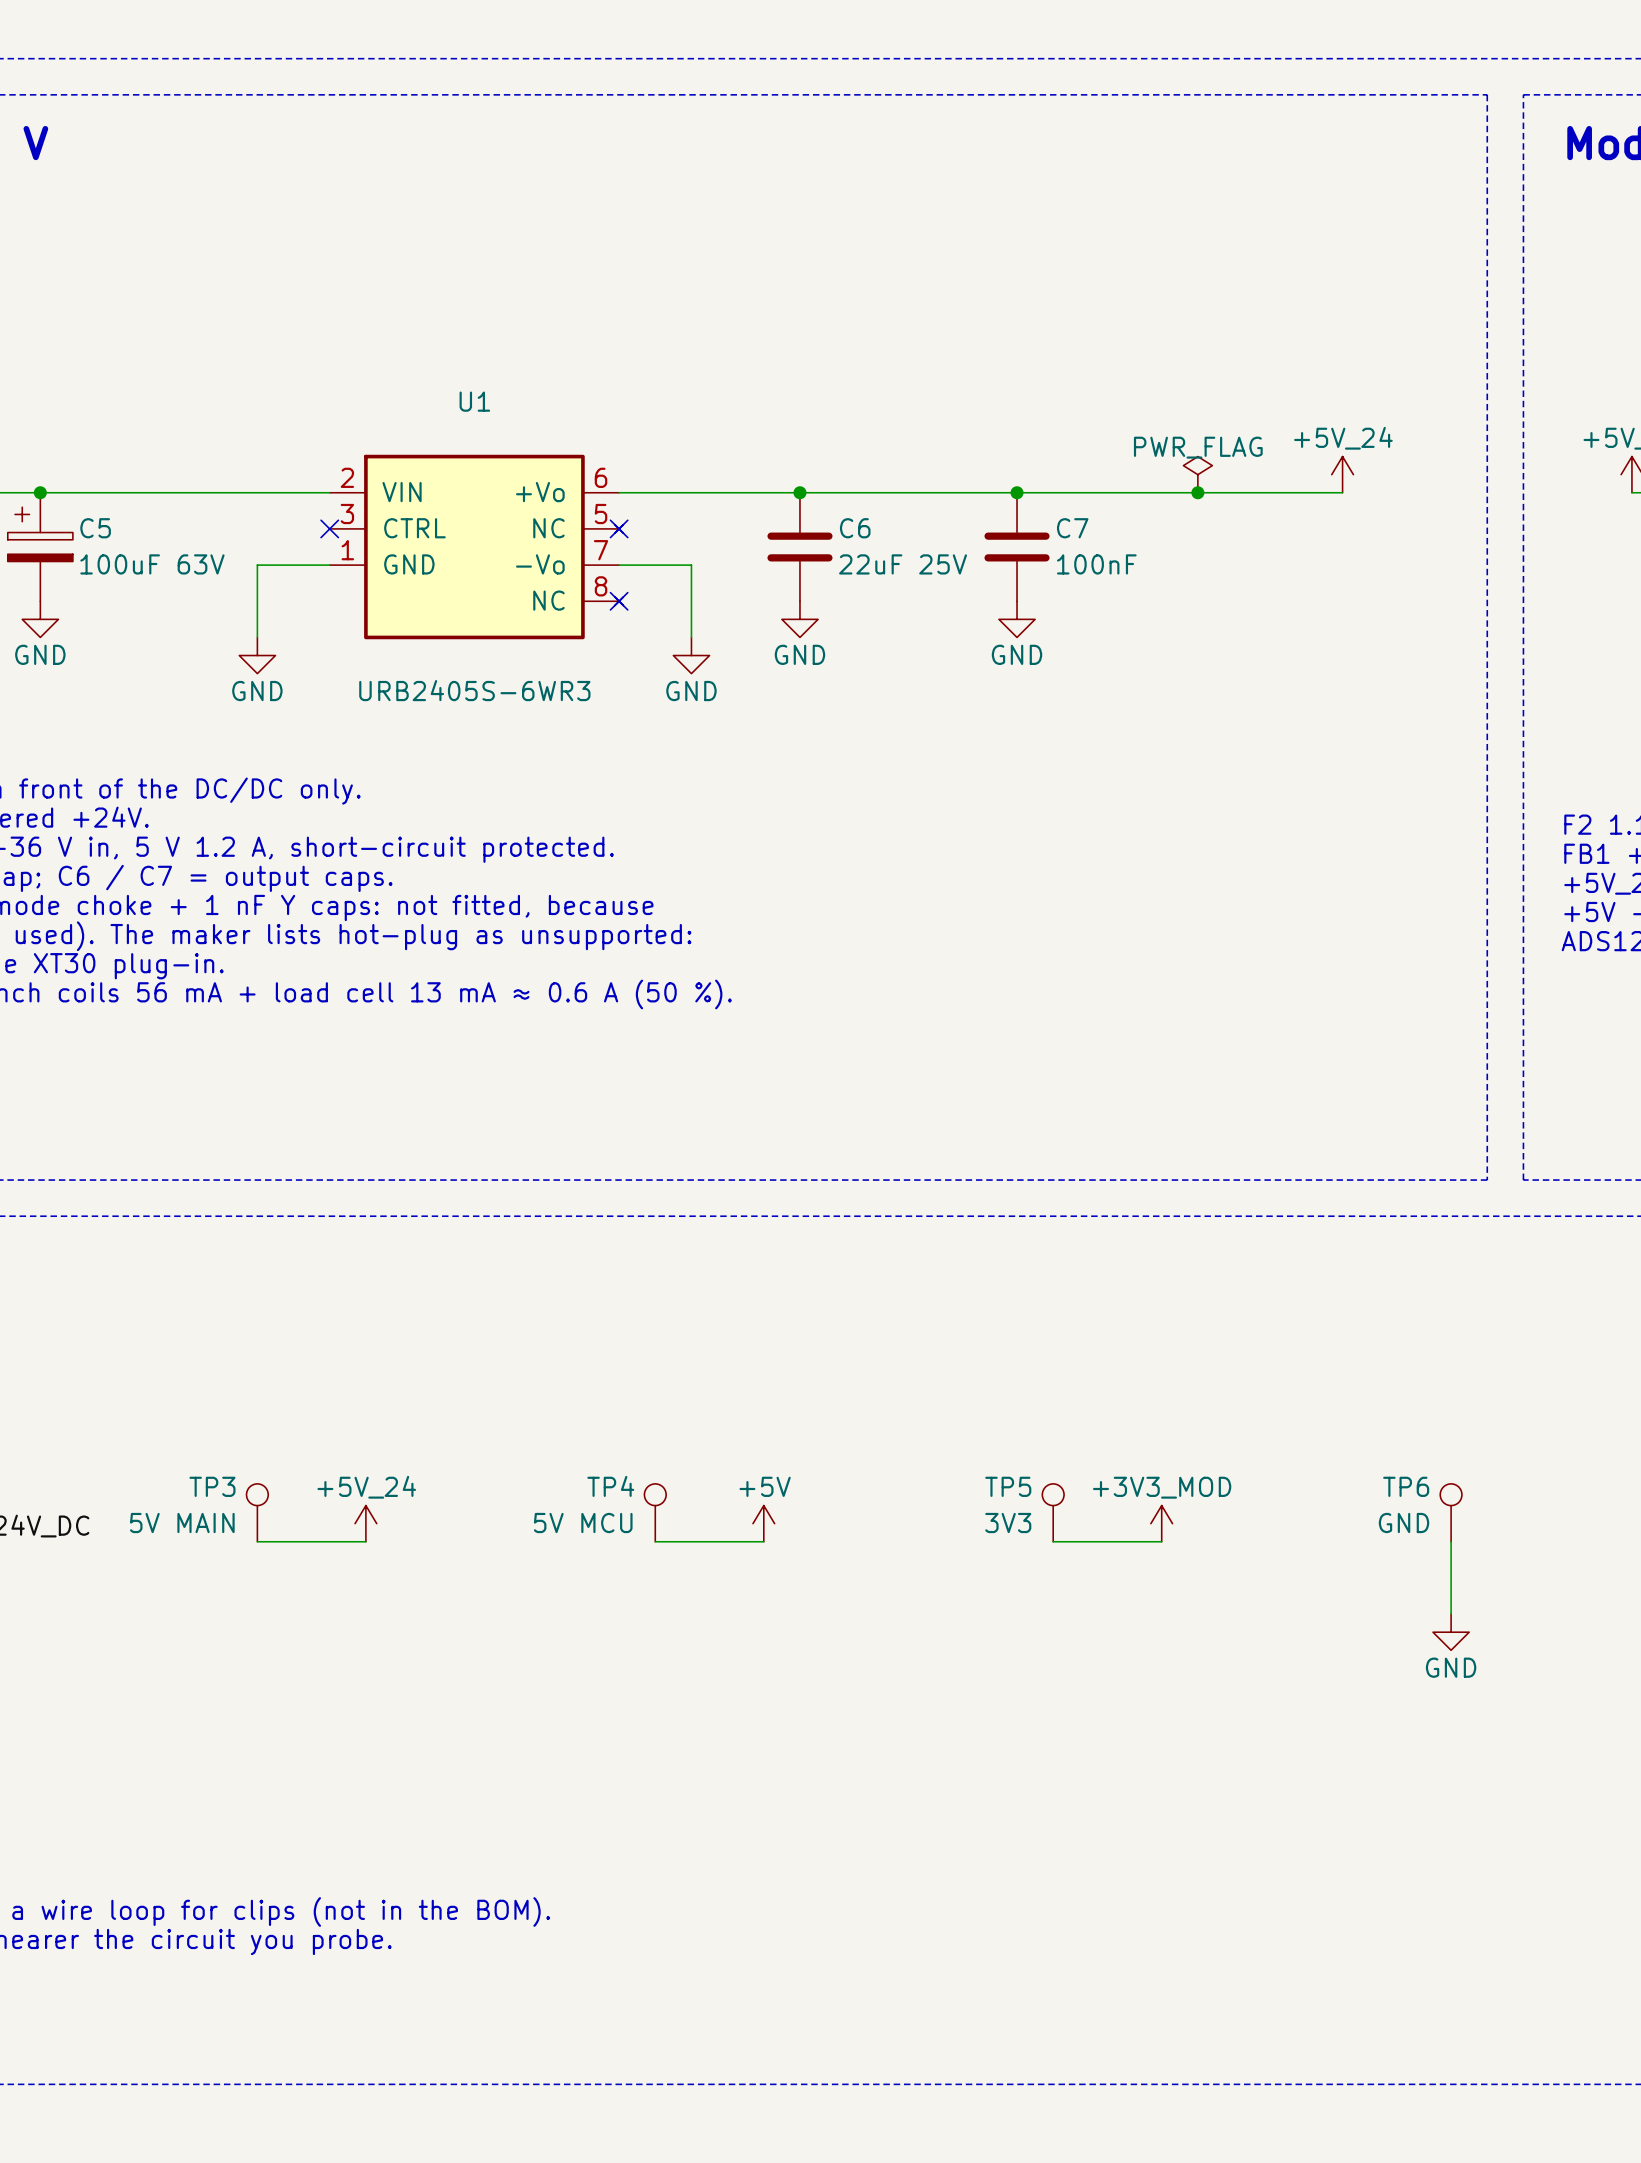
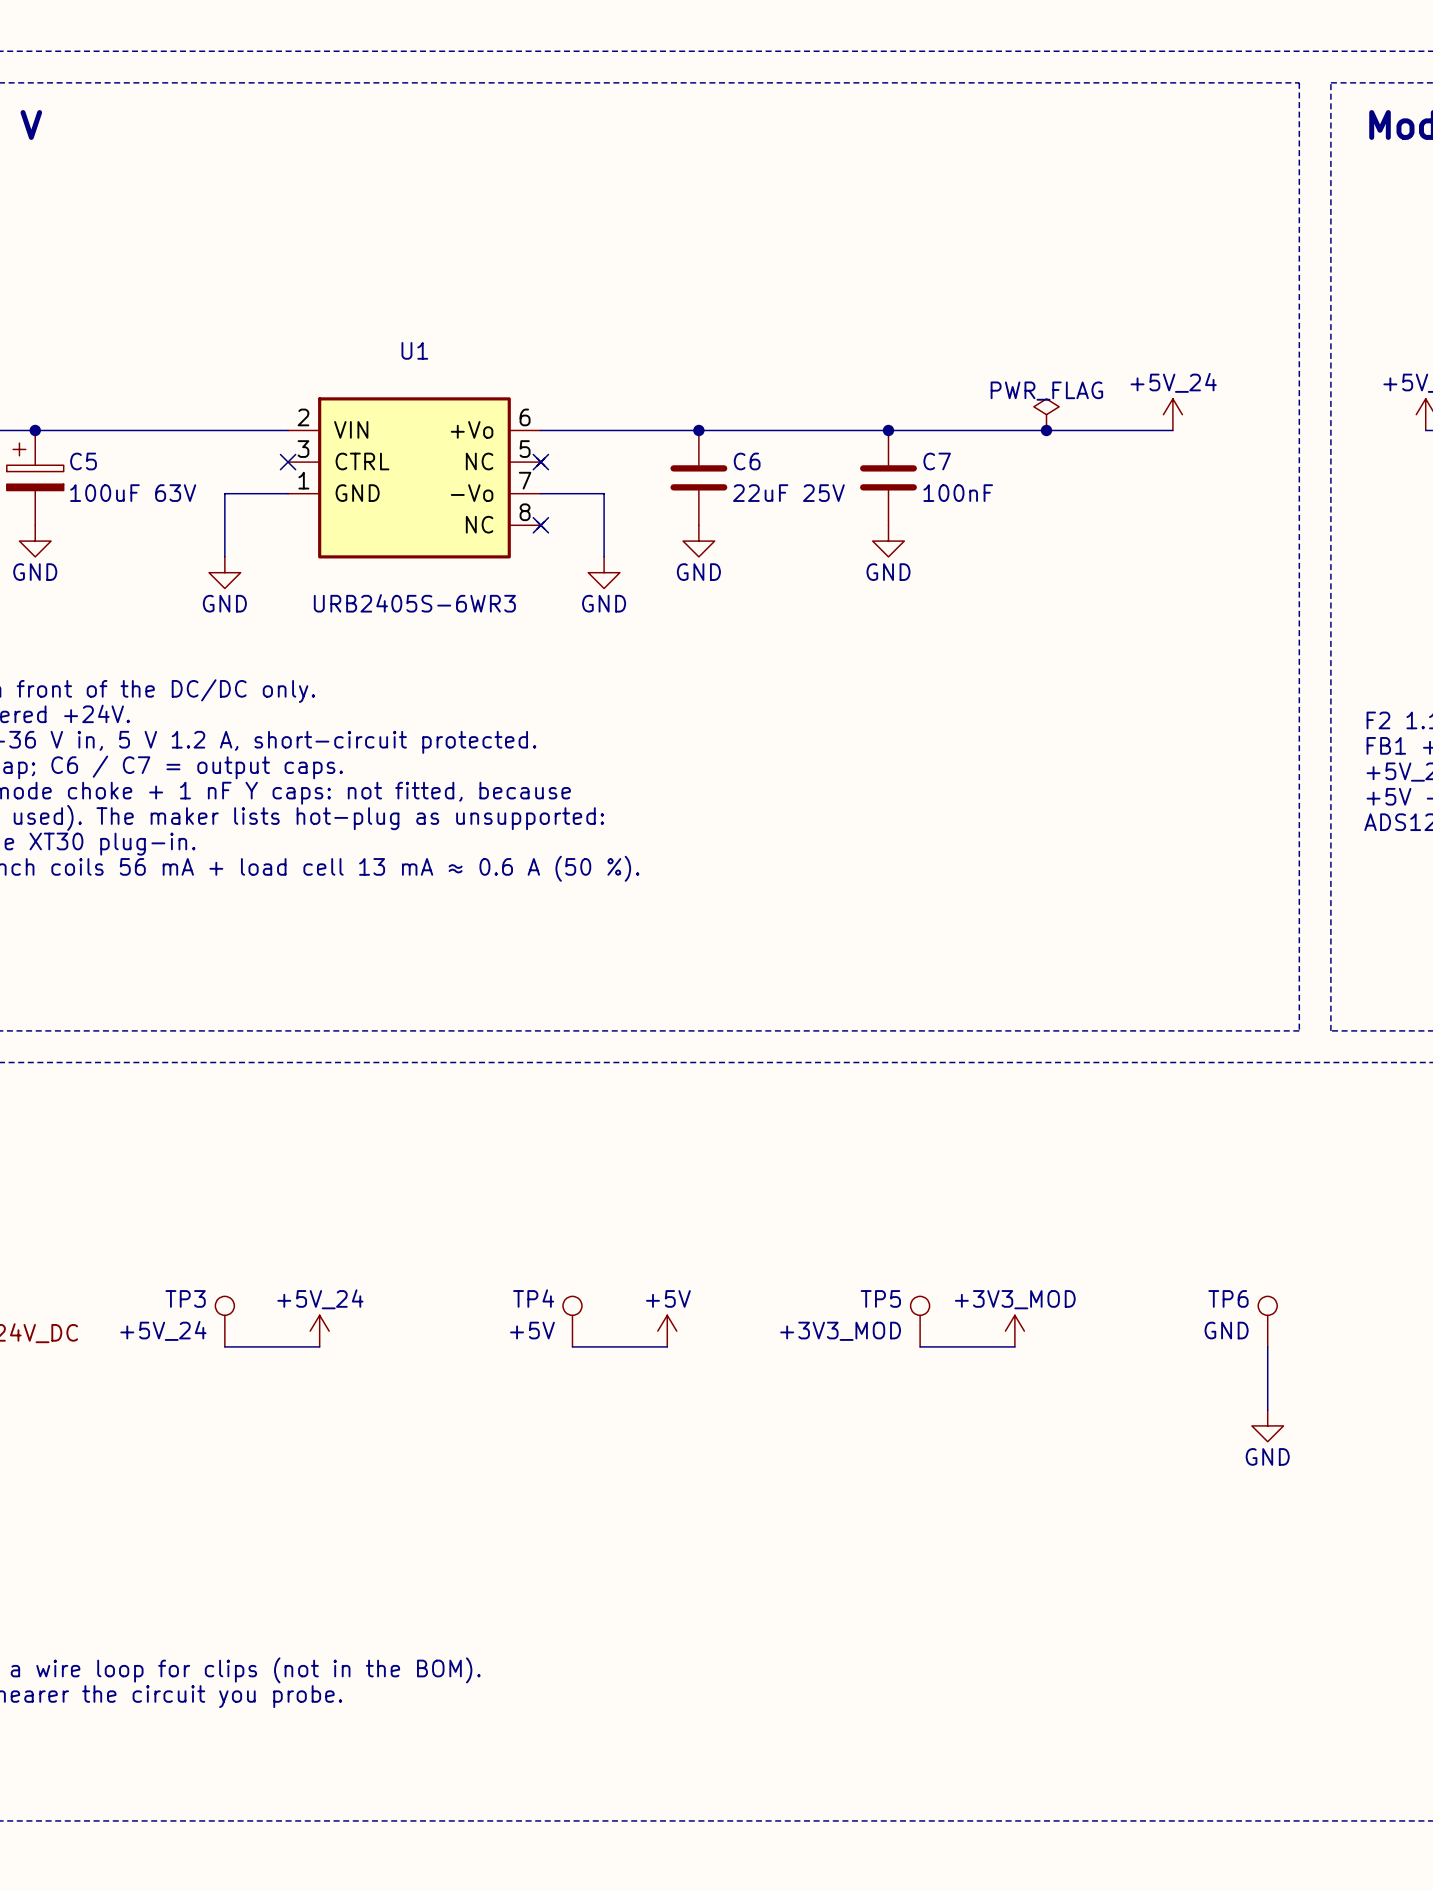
TP3 value: 5V MAIN (182, 1523) -> +5V_24 (163, 1330)
TP4 value: 5V MCU (583, 1523) -> +5V (532, 1330)
TP5 value: 3V3 (1008, 1523) -> +3V3_MOD (840, 1331)

